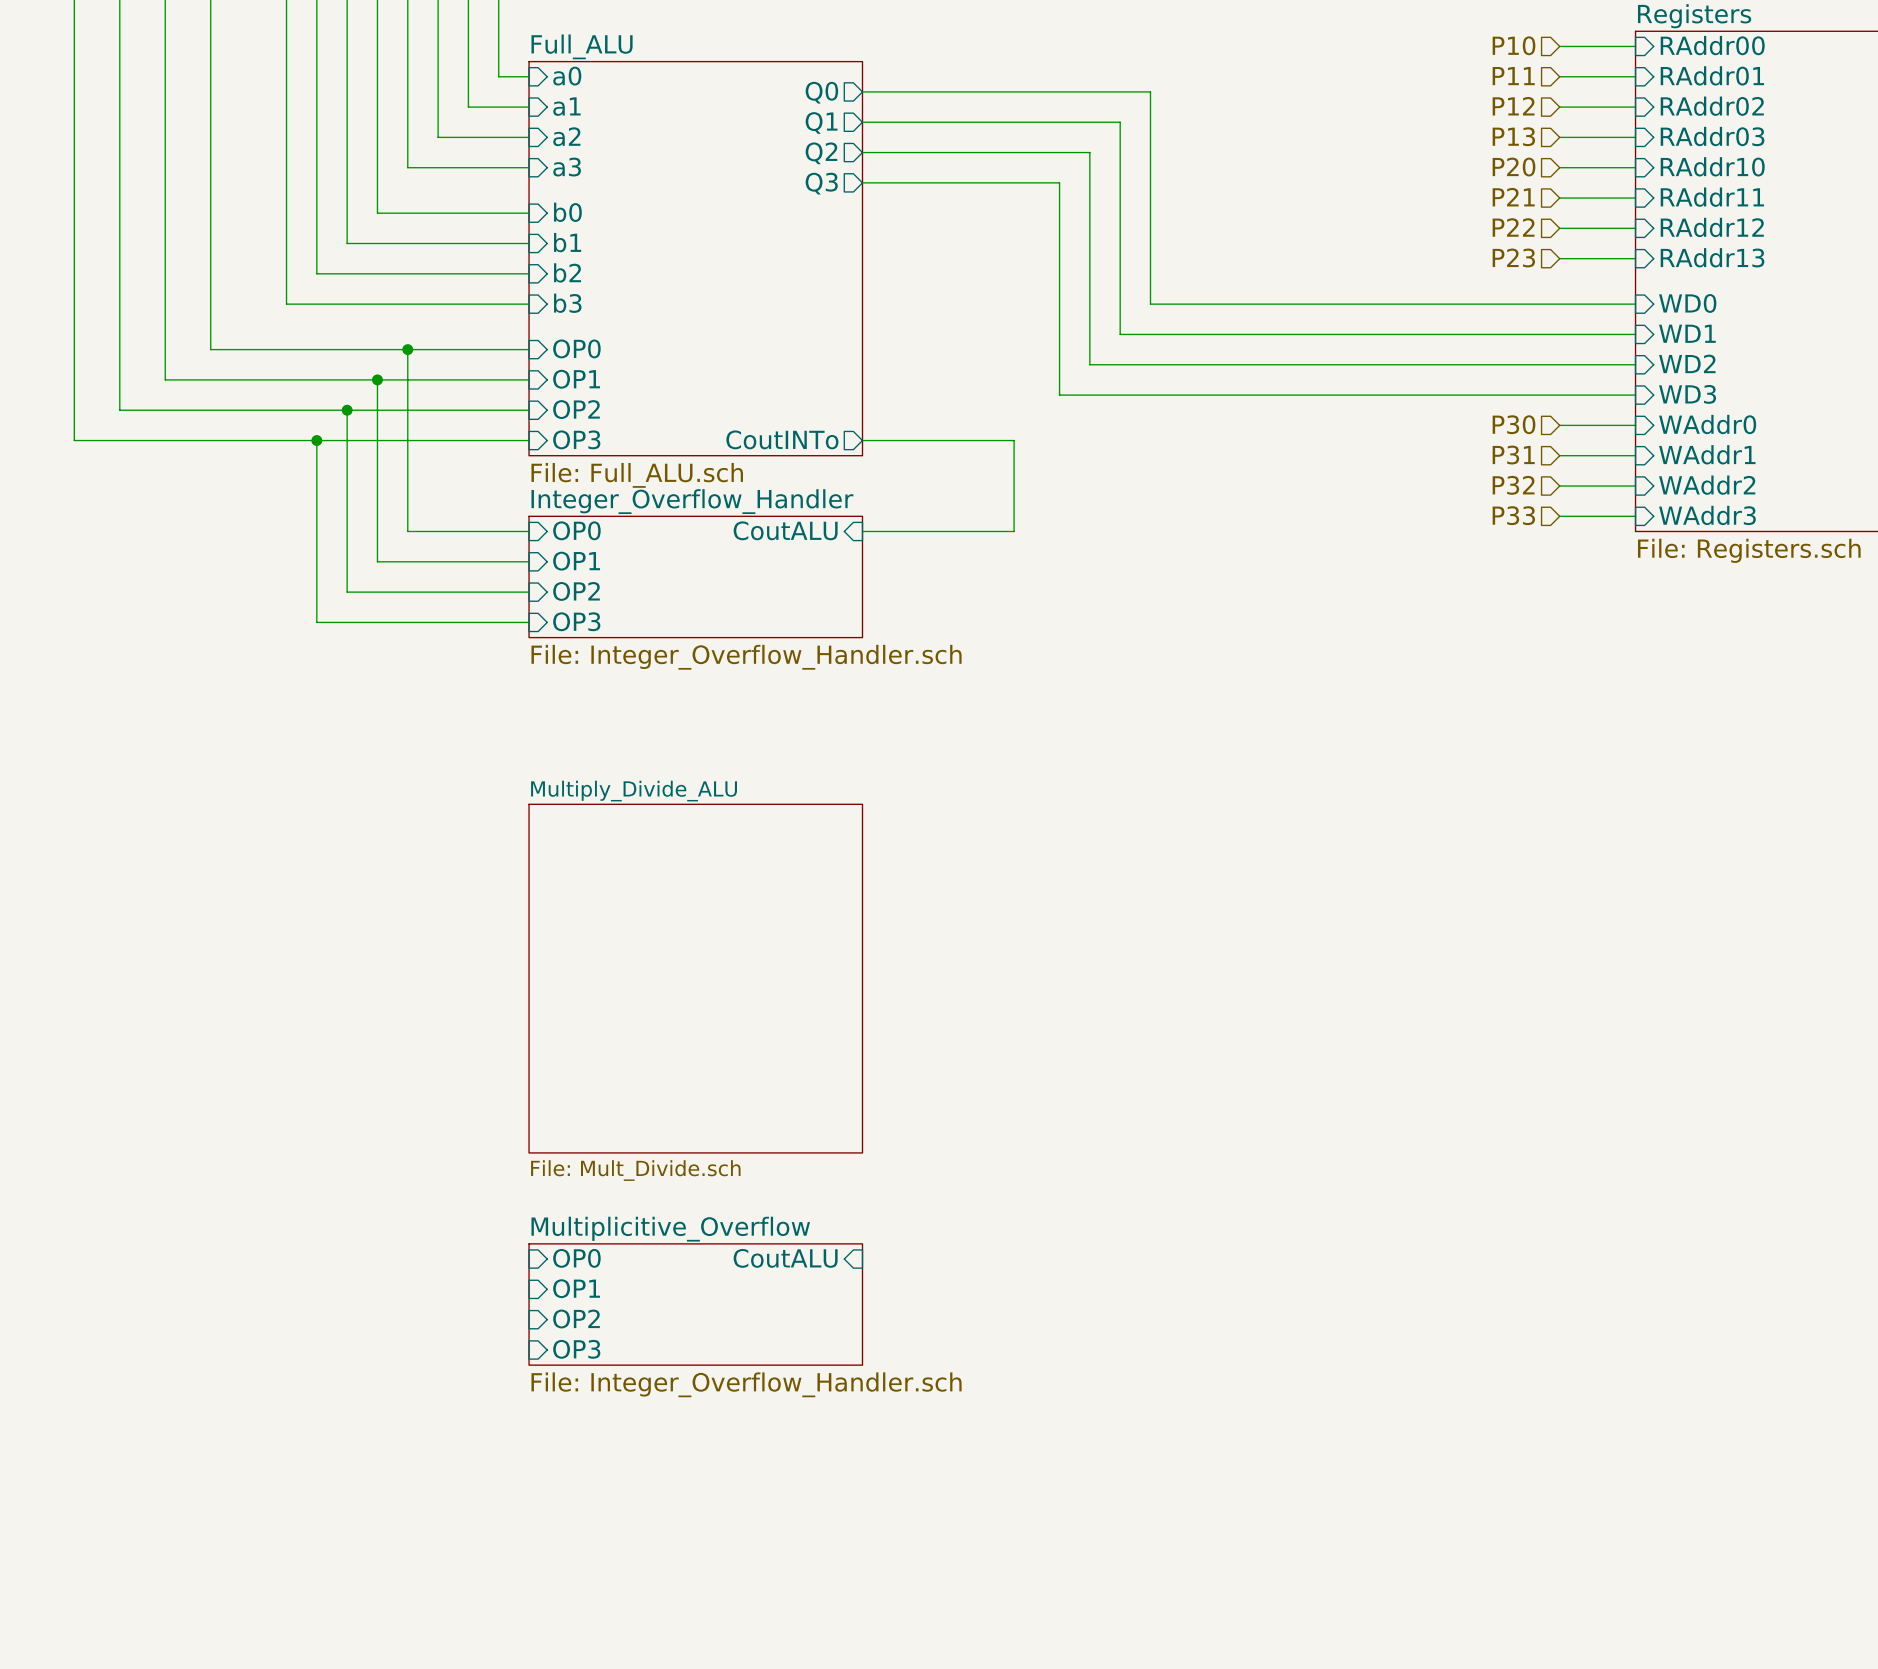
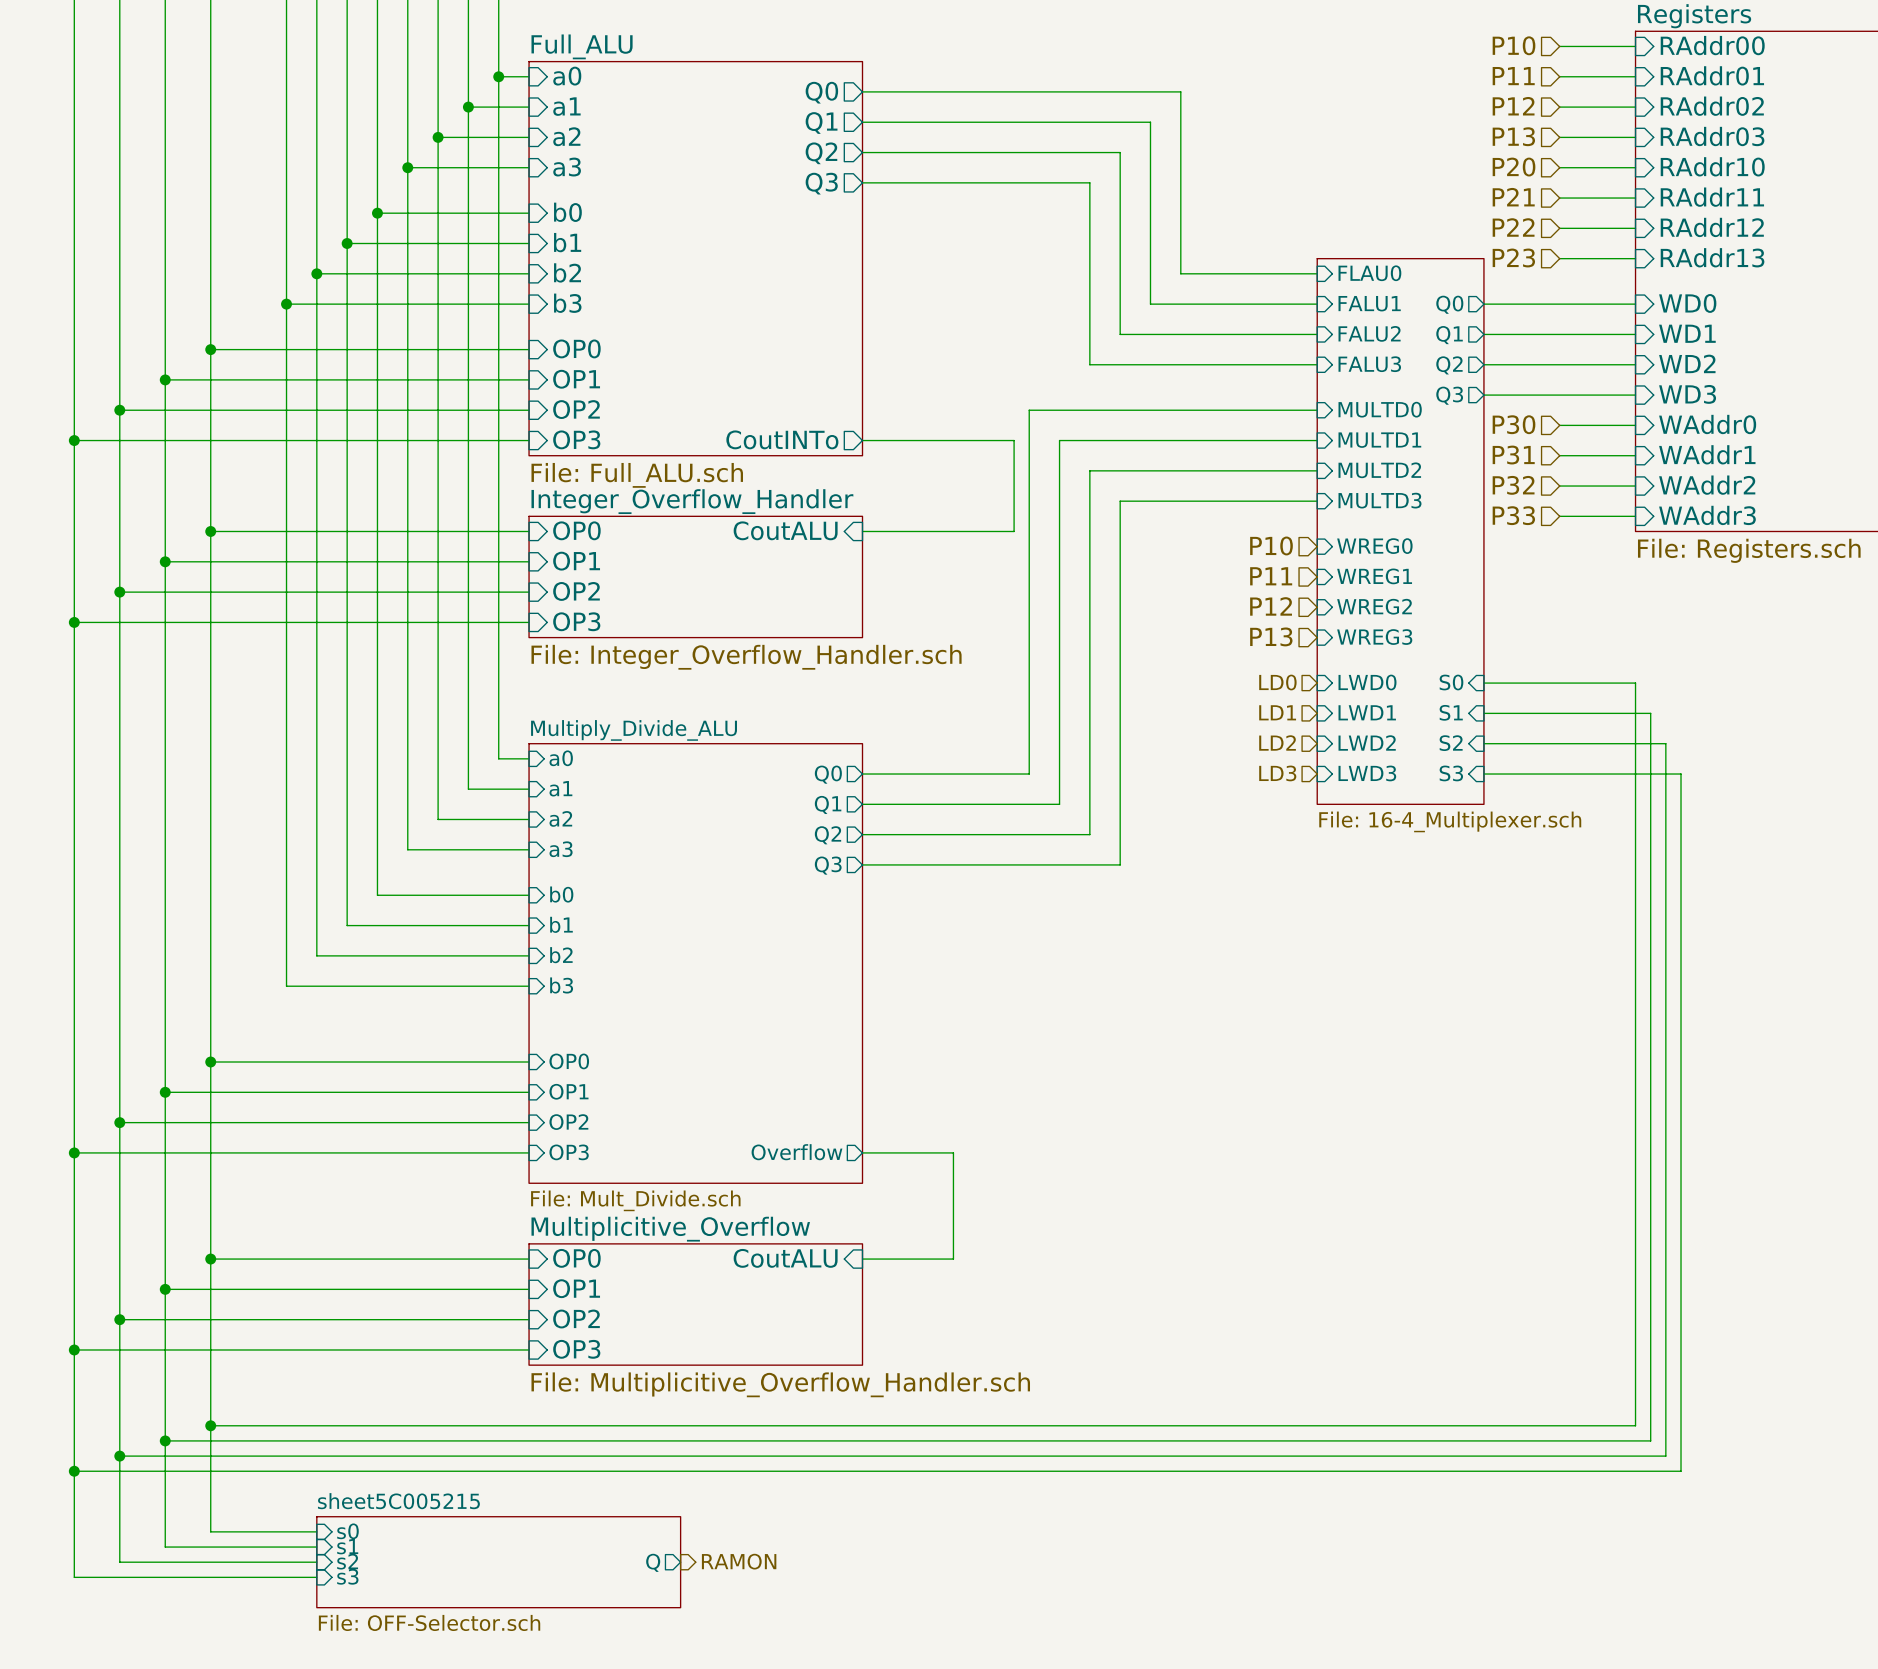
wire: none -> (498, 76) (498, 758) (529, 758)
junction: none -> (498, 76)
wire: (1150, 91) (1150, 122) -> (1120, 122) (1150, 122)
wire: none -> (1150, 91) (1180, 91) (1180, 273) (1317, 273)
wire: none -> (468, 107) (468, 789) (529, 789)
junction: none -> (468, 107)
wire: (1120, 122) (1120, 152) -> (1089, 152) (1120, 152)
wire: none -> (438, 137) (438, 819) (529, 819)
junction: none -> (438, 137)
wire: (1089, 152) (1089, 182) -> (1059, 182) (1089, 182)
wire: none -> (407, 167) (407, 349)
junction: none -> (407, 167)
wire: (1059, 182) (1059, 395) (1483, 395) -> none
wire: none -> (377, 213) (377, 379)
junction: none -> (377, 213)
wire: none -> (347, 243) (347, 410)
junction: none -> (347, 243)
wire: none -> (316, 273) (316, 440)
junction: none -> (316, 273)
sheet pin: none -> FLAU0 (1369, 273)
sheet pin: none -> FALU1 (1369, 303)
wire: none -> (286, 304) (286, 986) (529, 986)
junction: none -> (286, 304)
wire: (1317, 304) (1483, 304) -> none
sheet pin: none -> Q0 (1449, 304)
sheet pin: none -> FALU2 (1369, 333)
wire: (1317, 334) (1483, 334) -> none
sheet pin: none -> Q1 (1449, 335)
wire: none -> (210, 349) (210, 1531) (316, 1531)
junction: none -> (210, 349)
junction: (407, 349) -> none
wire: (1317, 364) (1483, 364) -> none
sheet pin: none -> FALU3 (1369, 364)
sheet pin: none -> Q2 (1449, 365)
wire: none -> (165, 379) (165, 1547) (316, 1547)
junction: none -> (165, 379)
junction: (377, 379) -> none
sheet pin: none -> Q3 (1449, 395)
sheet pin: none -> MULTD0 (1380, 409)
wire: none -> (119, 410) (119, 1562) (316, 1562)
junction: none -> (119, 410)
junction: (347, 410) -> none
wire: none -> (1317, 410) (1029, 410) (1029, 774) (862, 774)
wire: none -> (74, 440) (74, 1577) (316, 1577)
junction: none -> (74, 440)
junction: (316, 440) -> none
wire: none -> (1317, 440) (1059, 440) (1059, 804) (862, 804)
sheet pin: none -> MULTD1 (1379, 440)
wire: none -> (1317, 470) (1089, 470) (1089, 834) (862, 834)
sheet pin: none -> MULTD2 (1379, 470)
sheet pin: none -> MULTD3 (1380, 500)
wire: none -> (1317, 501) (1120, 501) (1120, 864) (862, 864)
wire: none -> (210, 531) (407, 531) (407, 849) (529, 849)
junction: none -> (210, 531)
sheet: none -> File: 16-4_Multiplexer.sch (1400, 531)
hierarchical label: none -> P10 (1271, 545)
sheet pin: none -> WREG0 (1374, 546)
wire: none -> (165, 561) (377, 561) (377, 895) (529, 895)
junction: none -> (165, 561)
hierarchical label: none -> P11 (1271, 576)
sheet pin: none -> WREG1 (1374, 576)
wire: none -> (119, 592) (347, 592) (347, 925) (529, 925)
junction: none -> (119, 592)
hierarchical label: none -> P12 (1271, 606)
sheet pin: none -> WREG2 (1374, 606)
wire: none -> (74, 622) (316, 622) (316, 955) (529, 955)
junction: none -> (74, 622)
hierarchical label: none -> P13 (1271, 636)
sheet pin: none -> WREG3 (1374, 637)
hierarchical label: none -> LD0 (1277, 682)
sheet pin: none -> LWD0 (1367, 682)
sheet pin: none -> S0 (1451, 682)
wire: none -> (1483, 683) (1635, 683) (1635, 1425) (210, 1425)
hierarchical label: none -> LD1 (1277, 712)
sheet pin: none -> LWD1 (1367, 712)
sheet pin: none -> S1 (1451, 712)
wire: none -> (1483, 713) (1650, 713) (1650, 1440) (165, 1440)
hierarchical label: none -> LD2 (1277, 742)
sheet pin: none -> LWD2 (1367, 742)
sheet pin: none -> S2 (1451, 743)
wire: none -> (1483, 743) (1665, 743) (1665, 1456) (119, 1456)
sheet pin: none -> a0 (561, 758)
hierarchical label: none -> LD3 (1277, 773)
sheet pin: none -> LWD3 (1367, 773)
sheet pin: none -> S3 (1451, 773)
sheet pin: none -> Q0 (828, 774)
wire: none -> (1483, 774) (1681, 774) (1681, 1471) (74, 1471)
sheet pin: none -> a1 (560, 788)
sheet pin: none -> Q1 (828, 804)
sheet pin: none -> a2 (560, 818)
sheet pin: none -> Q2 (828, 835)
sheet pin: none -> a3 (561, 849)
sheet pin: none -> Q3 (828, 865)
sheet pin: none -> b0 (561, 894)
sheet pin: none -> b1 (561, 924)
sheet pin: none -> b2 (561, 955)
sheet Multiply_Divide_ALU: none -> File: Mult_Divide.sch (695, 963)
sheet Multiply_Divide_ALU: File: Mult_Divide.sch (695, 978) -> none
sheet pin: none -> b3 (561, 985)
sheet pin: none -> OP0 (569, 1061)
wire: none -> (210, 1062) (529, 1062)
junction: none -> (210, 1062)
sheet pin: none -> OP1 (568, 1091)
wire: none -> (165, 1092) (529, 1092)
junction: none -> (165, 1092)
wire: none -> (119, 1122) (529, 1122)
junction: none -> (119, 1122)
sheet pin: none -> OP2 (568, 1122)
wire: none -> (74, 1152) (529, 1152)
junction: none -> (74, 1152)
sheet pin: none -> OP3 (569, 1152)
sheet pin: none -> Overflow (796, 1152)
wire: none -> (862, 1152) (953, 1152) (953, 1259) (862, 1259)
wire: none -> (210, 1259) (529, 1259)
junction: none -> (210, 1259)
wire: none -> (165, 1289) (529, 1289)
junction: none -> (165, 1289)
wire: none -> (119, 1319) (529, 1319)
junction: none -> (119, 1319)
wire: none -> (74, 1349) (529, 1349)
junction: none -> (74, 1349)
sheet Multiplicitive_Overflow value: File: Integer_Overflow_Handler.sch (746, 1384) -> File: Multiplicitive_Overflow_Handler.sch (780, 1384)
junction: none -> (210, 1425)
junction: none -> (165, 1440)
junction: none -> (119, 1456)
junction: none -> (74, 1471)
sheet pin: none -> s0 (347, 1531)
sheet pin: none -> s1 (347, 1546)
sheet pin: none -> s2 (347, 1561)
hierarchical label: none -> RAMON (739, 1561)
sheet sheet5C005215: none -> File: OFF-Selector.sch (498, 1562)
sheet pin: none -> Q (653, 1562)
sheet pin: none -> s3 (347, 1576)

